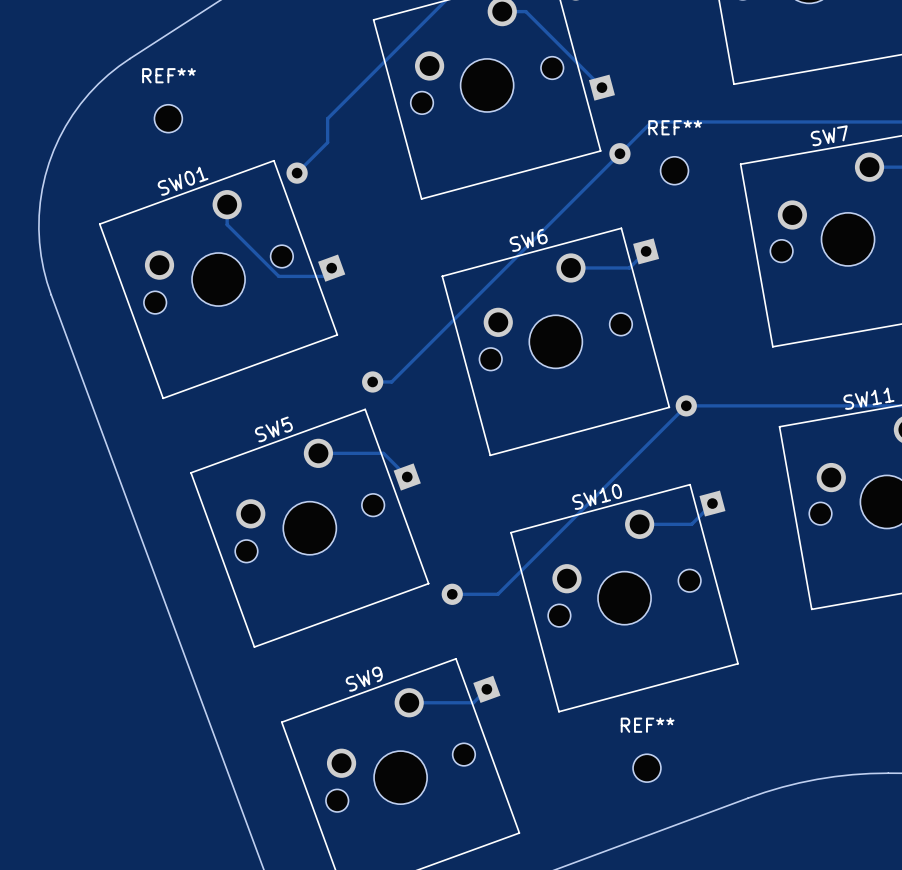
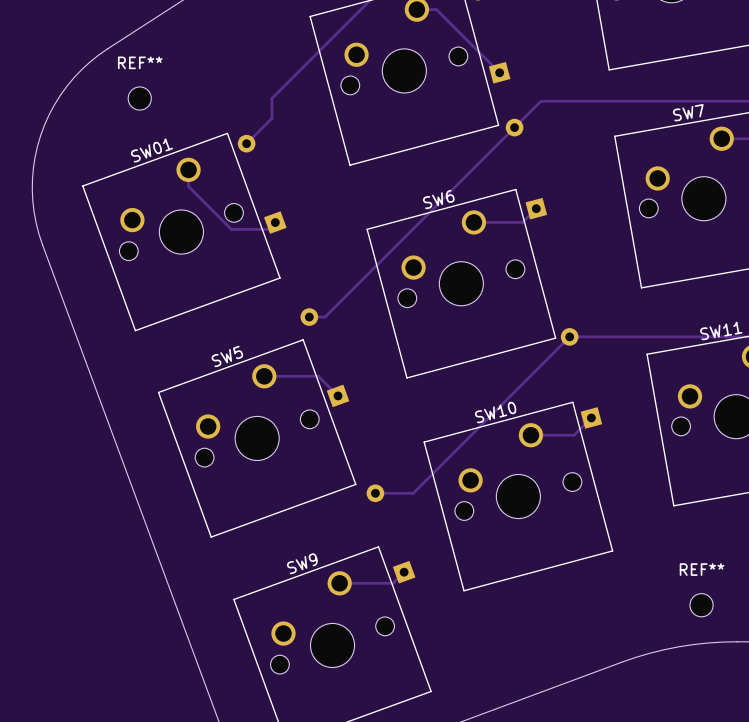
REF**: (674, 170) -> none
REF** position: (646, 768) -> (701, 605)

